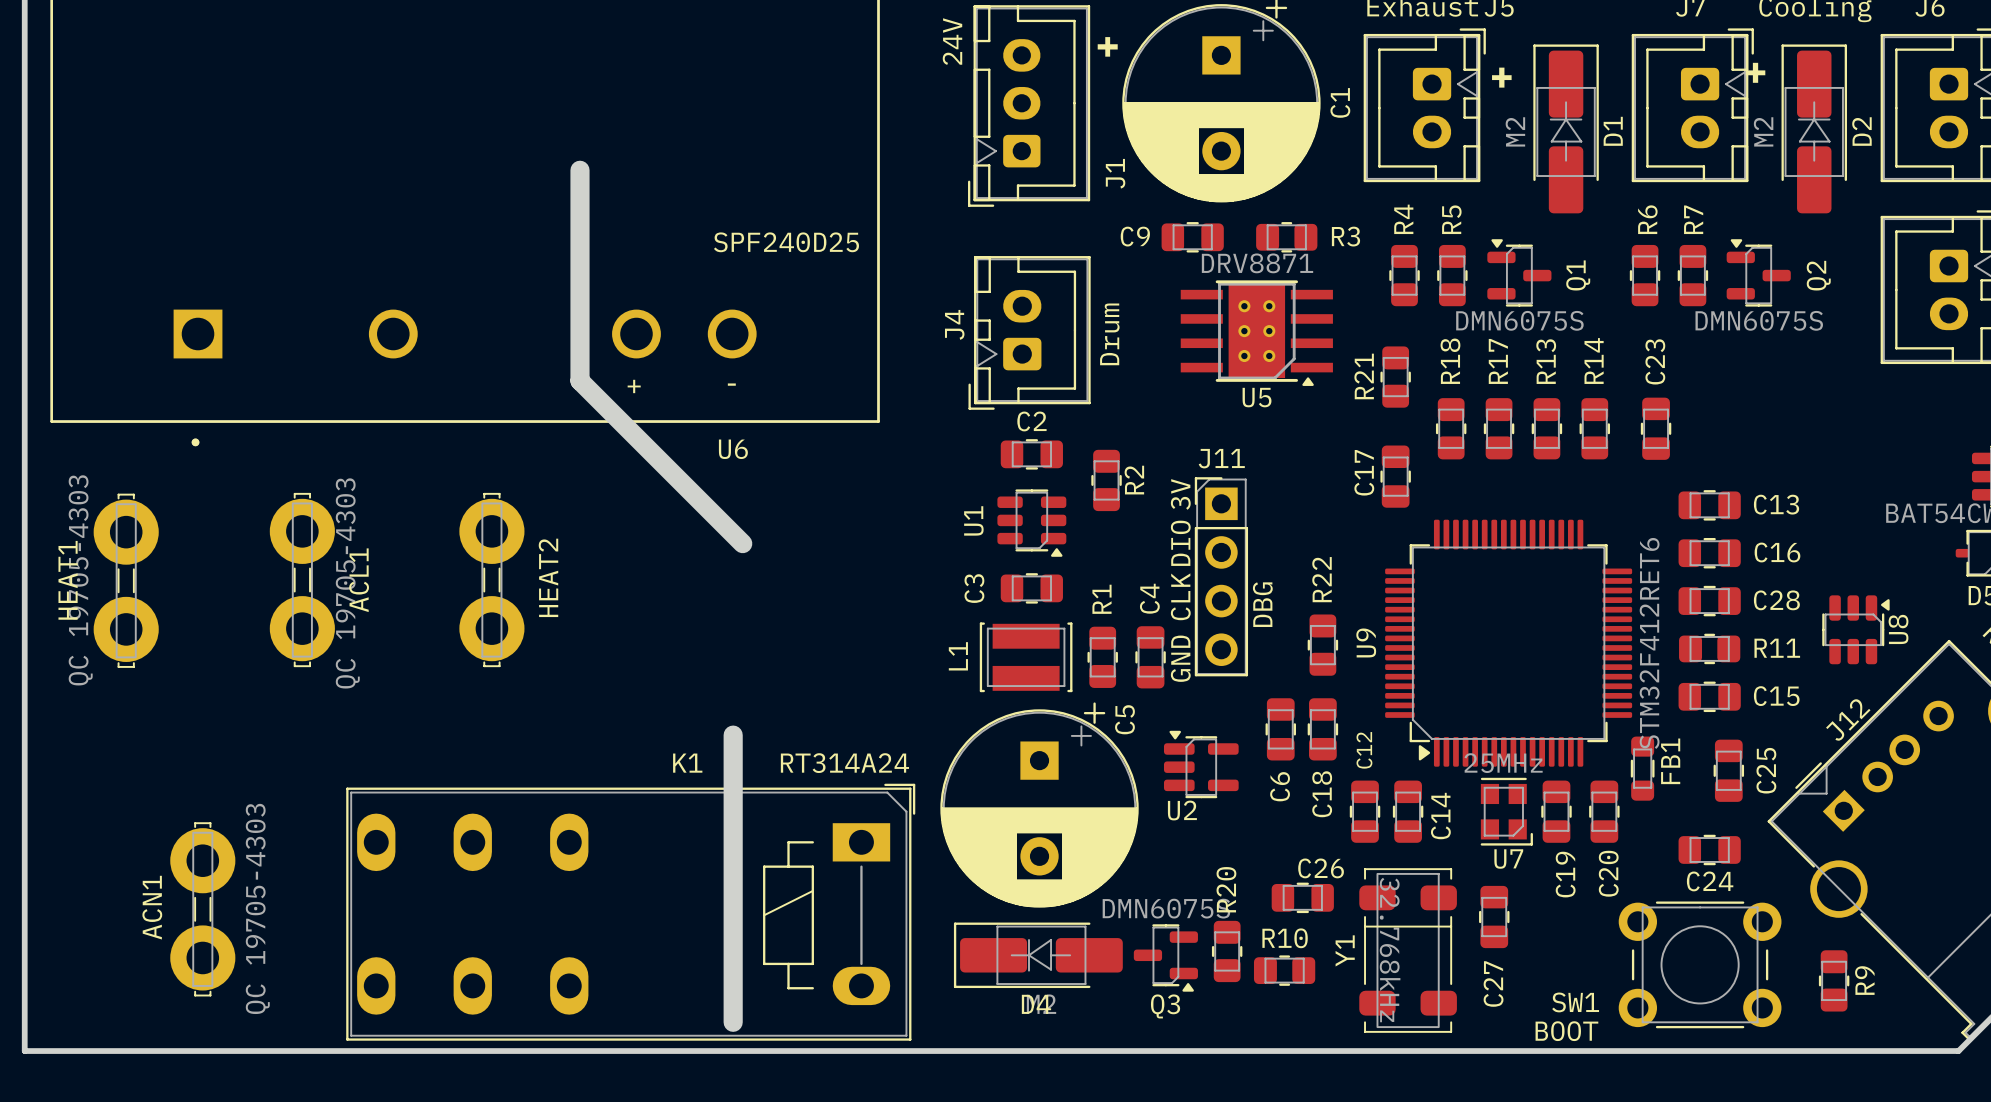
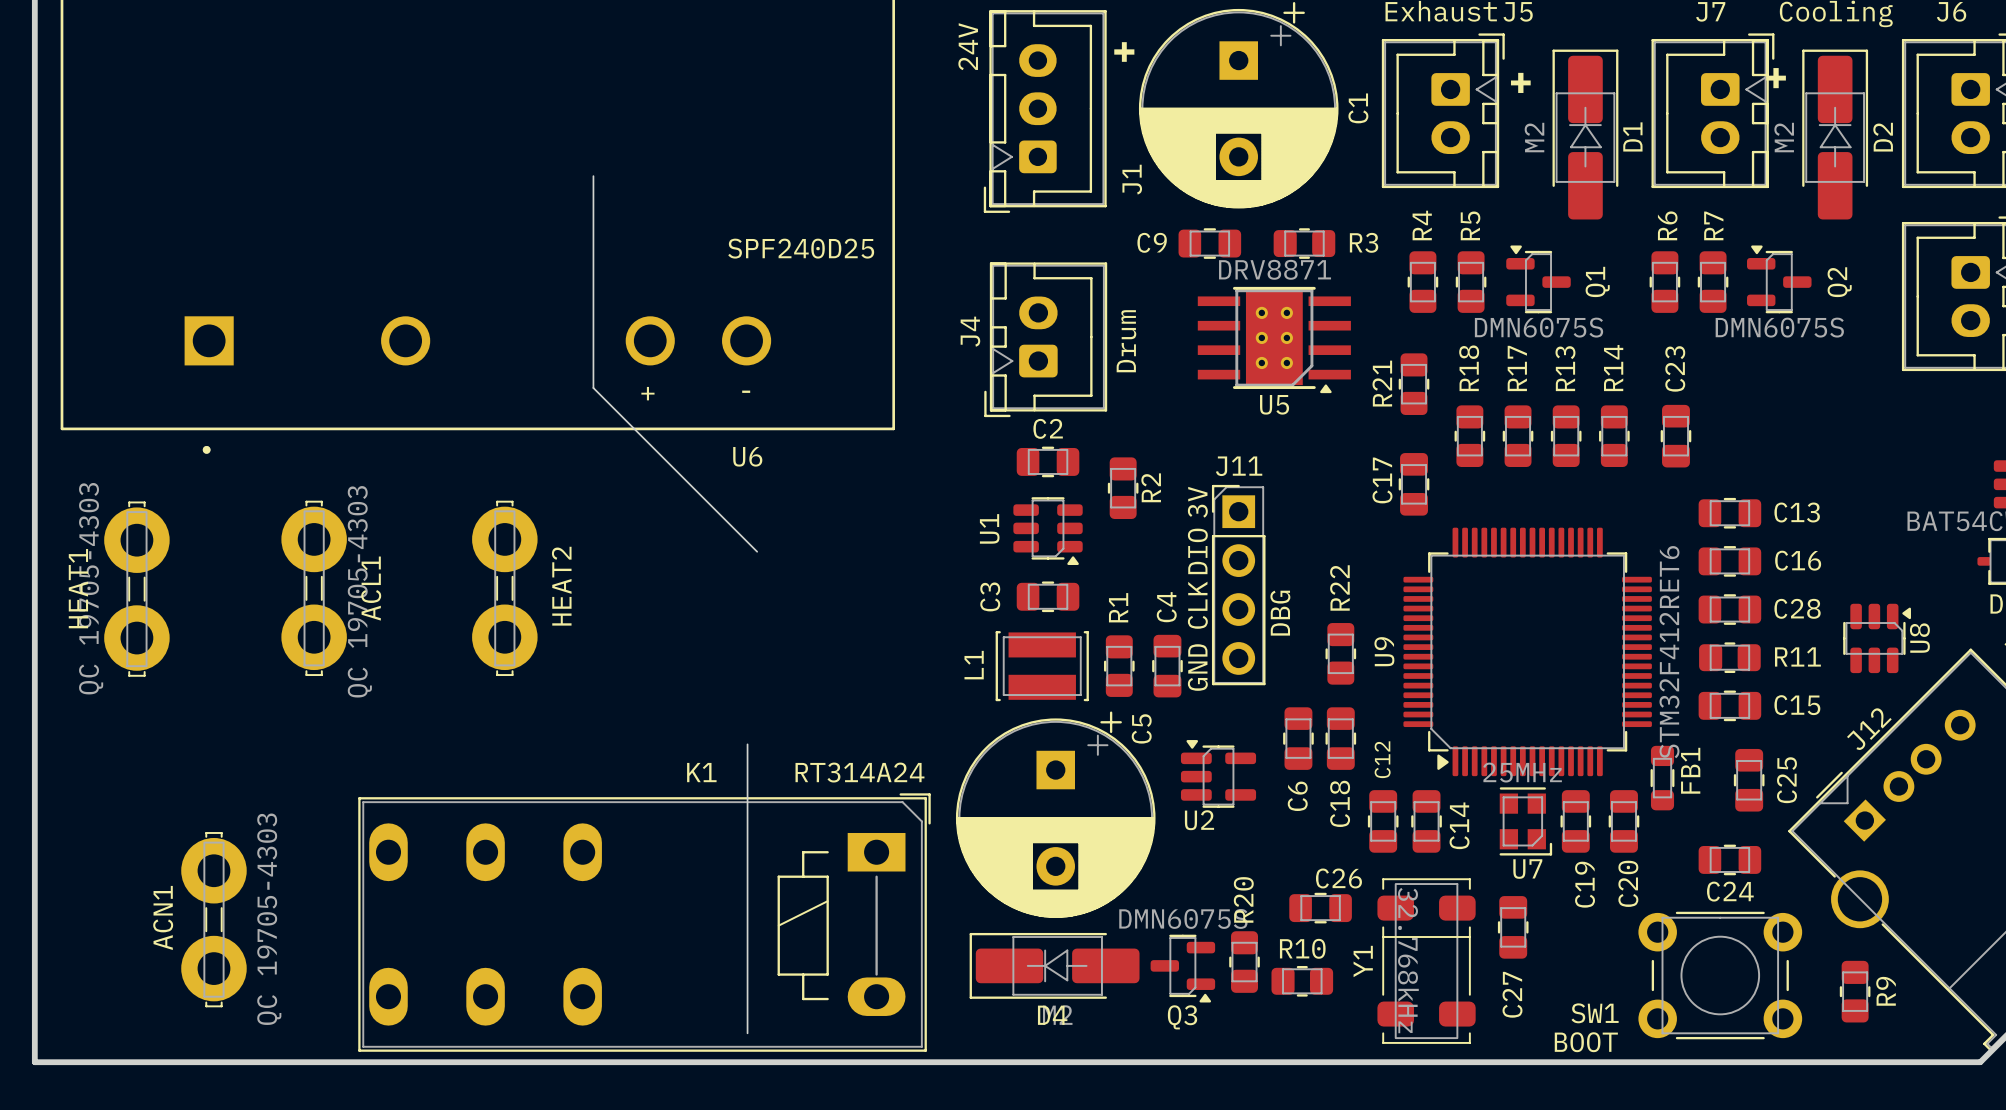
board edge width: thick (579, 170) (579, 380) (742, 543) -> thin (593, 176) (593, 388) (757, 551)
board edge width: thick (733, 735) (733, 1022) -> thin (747, 744) (747, 1033)

